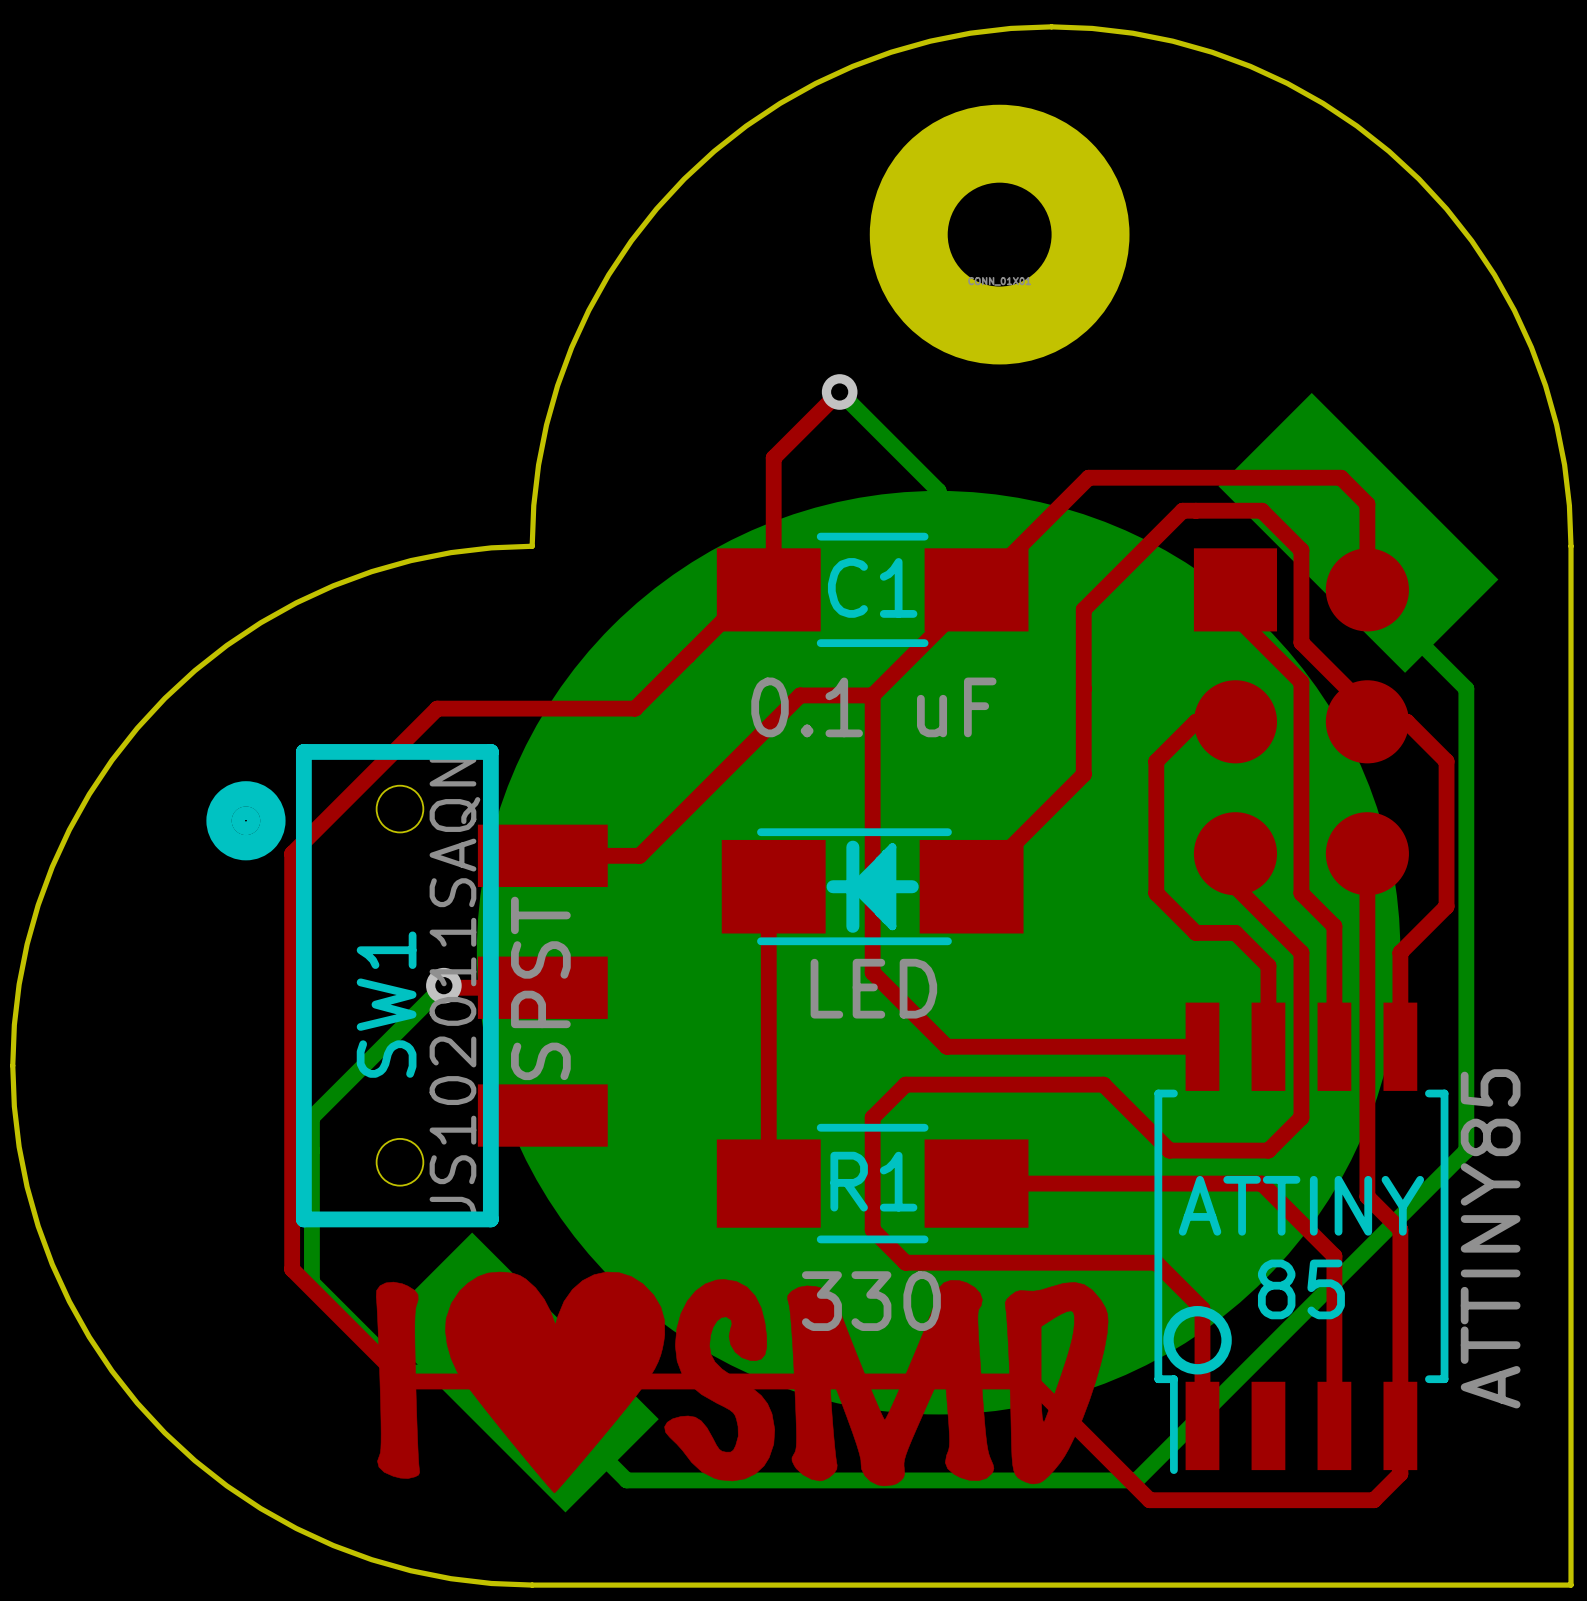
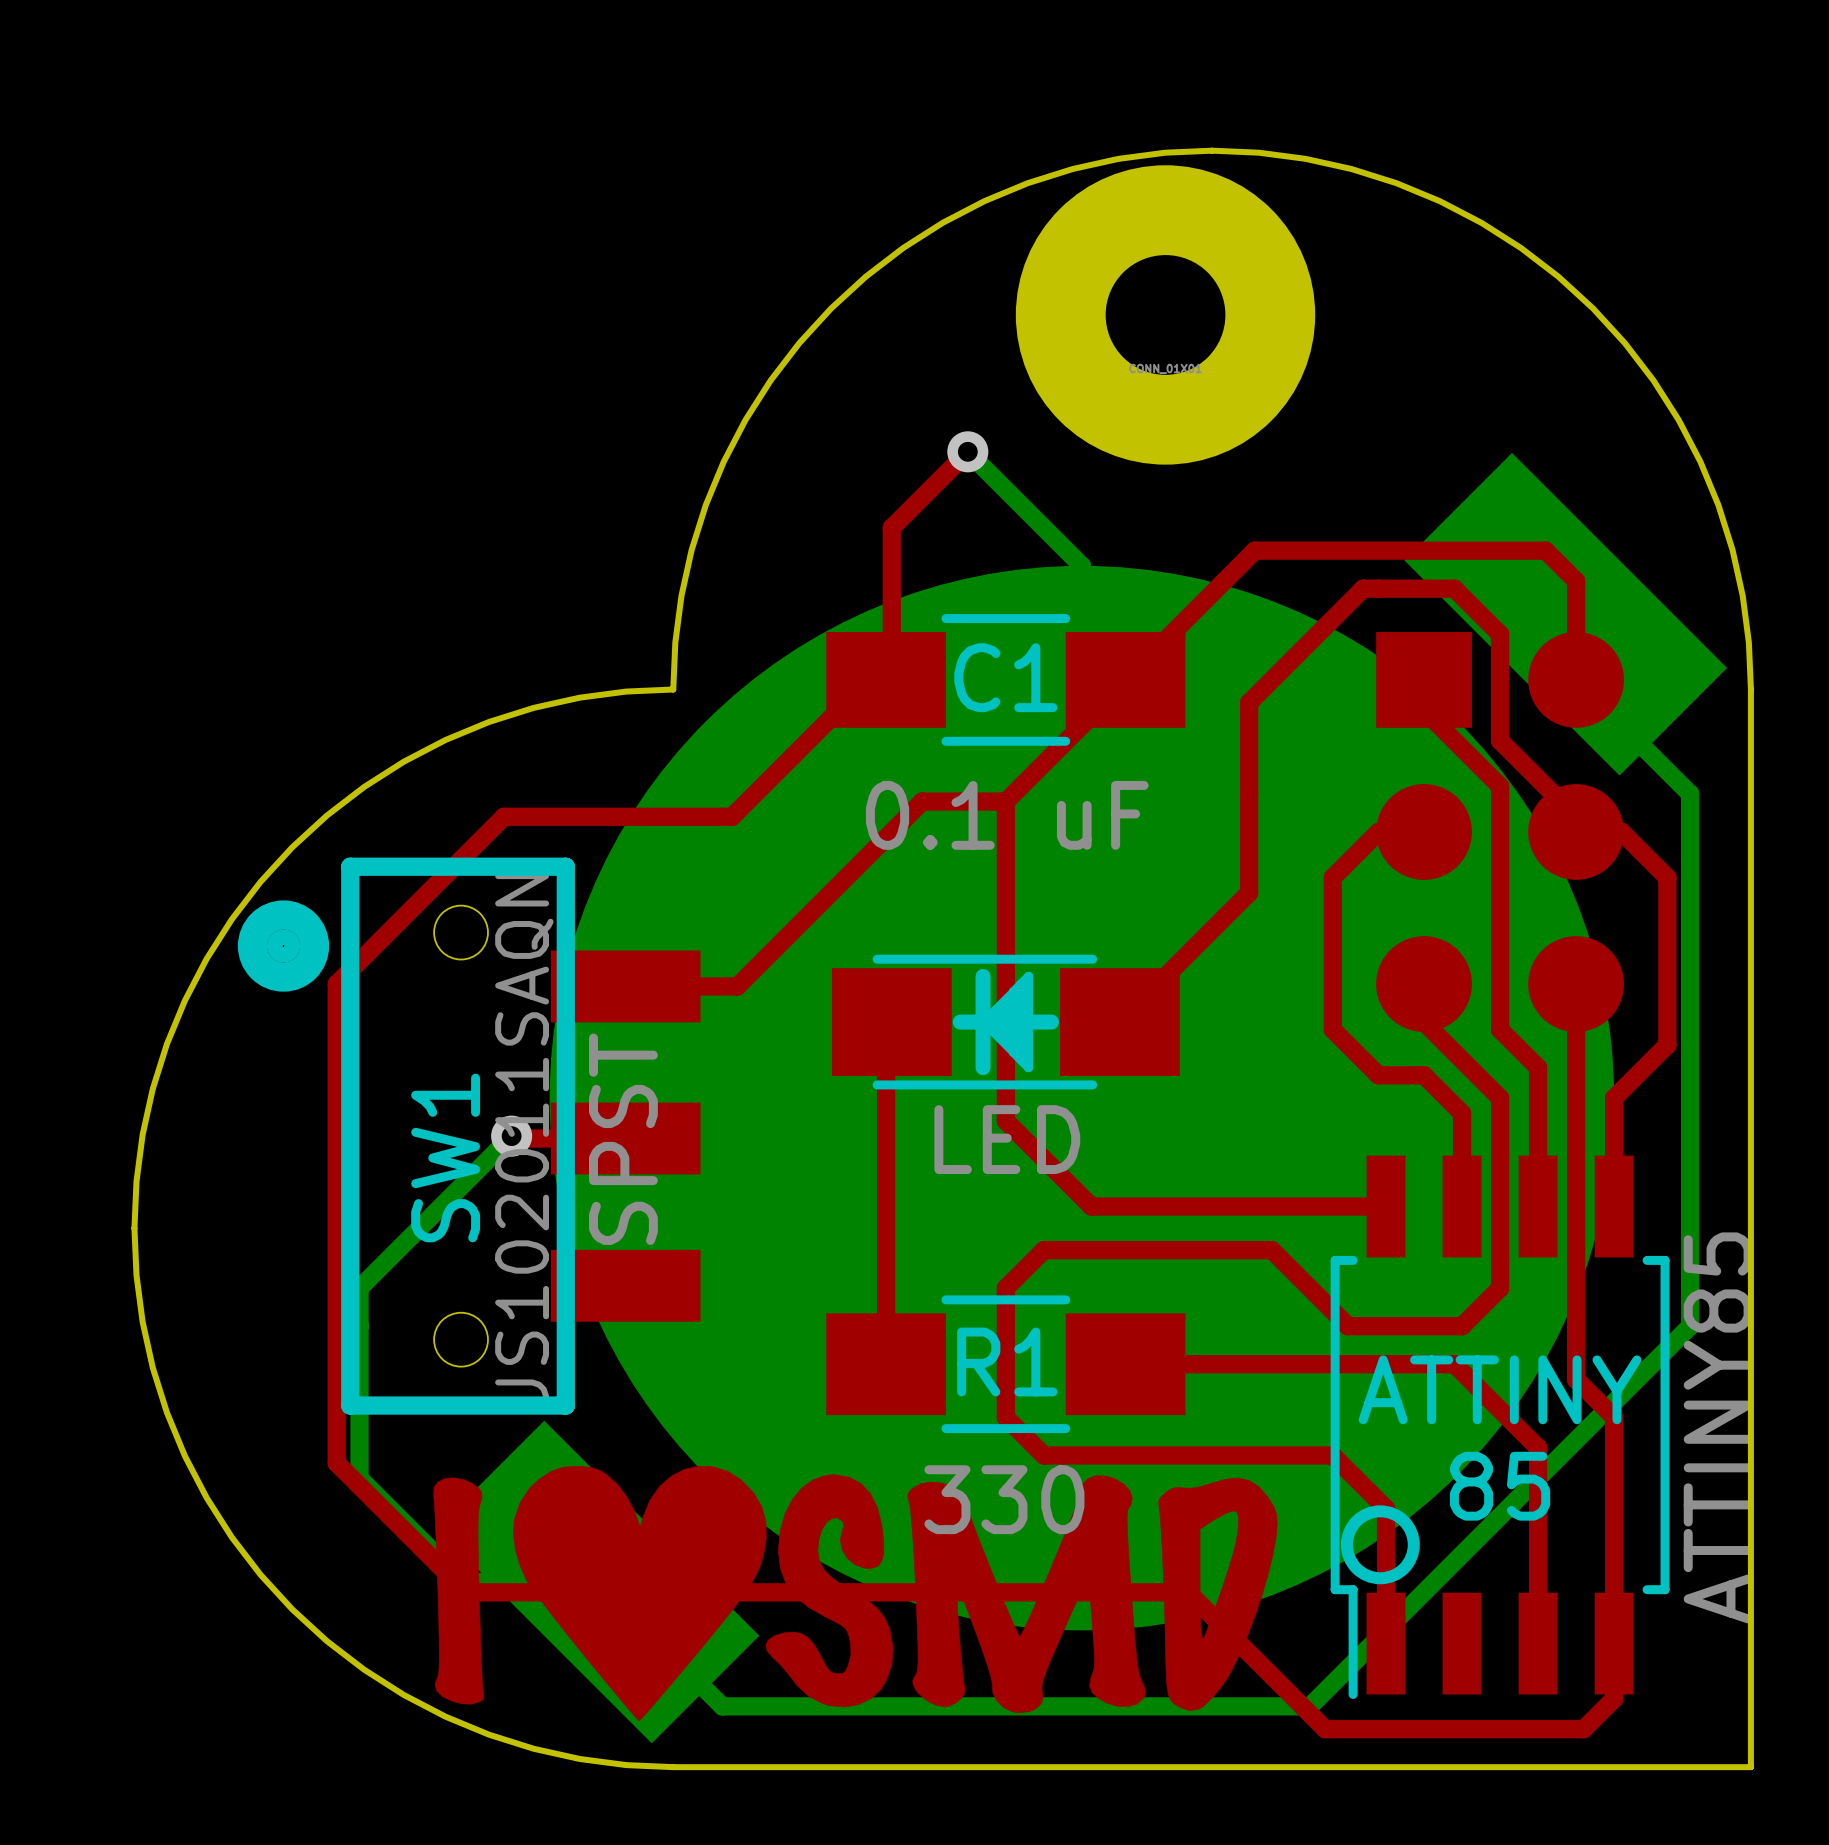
board edge: (1051, 26) (1010, 28) (970, 33) (930, 41) (891, 52) (852, 66) (815, 83) (780, 103) (746, 126) (714, 151) (684, 178) (656, 208) (631, 240) (608, 274) (588, 310) (571, 347) (557, 385) (546, 425) (538, 465) (533, 505) (532, 546) (491, 547) (450, 552) (410, 560) (371, 571) (333, 585) (296, 602) (260, 622) (226, 645) (194, 670) (164, 698) (137, 728) (111, 760) (89, 794) (69, 829) (52, 866) (38, 905) (27, 944) (19, 984) (14, 1024) (12, 1065) (14, 1106) (19, 1146) (27, 1186) (38, 1226) (52, 1264) (69, 1301) (89, 1337) (111, 1370) (137, 1403) (164, 1432) (194, 1460) (226, 1485) (260, 1508) (296, 1528) (333, 1545) (371, 1559) (410, 1570) (450, 1578) (491, 1583) (532, 1585) (1571, 1585) (1571, 546) (1569, 505) (1564, 465) (1556, 425) (1545, 385) (1531, 347) (1514, 310) (1494, 274) (1471, 240) (1446, 208) (1418, 178) (1388, 151) (1356, 126) (1322, 103) (1287, 83) (1250, 66) (1212, 52) (1172, 41) (1132, 33) (1092, 28) (1051, 26) -> (1212, 150) (1165, 152) (1118, 158) (1072, 169) (1027, 183) (984, 201) (942, 222) (903, 248) (865, 276) (831, 308) (799, 343) (770, 380) (745, 420) (723, 461) (705, 505) (691, 550) (681, 595) (675, 642) (673, 689) (626, 691) (579, 697) (533, 707) (488, 721) (445, 739) (403, 761) (364, 786) (326, 815) (292, 847) (260, 881) (231, 919) (206, 958) (184, 1000) (166, 1044) (152, 1088) (142, 1134) (136, 1181) (134, 1228) (136, 1275) (142, 1321) (152, 1367) (166, 1412) (184, 1456) (206, 1497) (231, 1537) (260, 1574) (292, 1609) (326, 1641) (364, 1669) (403, 1694) (445, 1716) (488, 1734) (533, 1748) (579, 1758) (626, 1765) (673, 1767) (1750, 1767) (1750, 689) (1748, 642) (1742, 595) (1732, 550) (1718, 505) (1700, 461) (1678, 420) (1653, 380) (1624, 343) (1593, 308) (1558, 276) (1521, 248) (1481, 222) (1439, 201) (1396, 183) (1351, 169) (1305, 158) (1259, 152) (1212, 150)
part position: (999, 234) -> (1165, 314)

